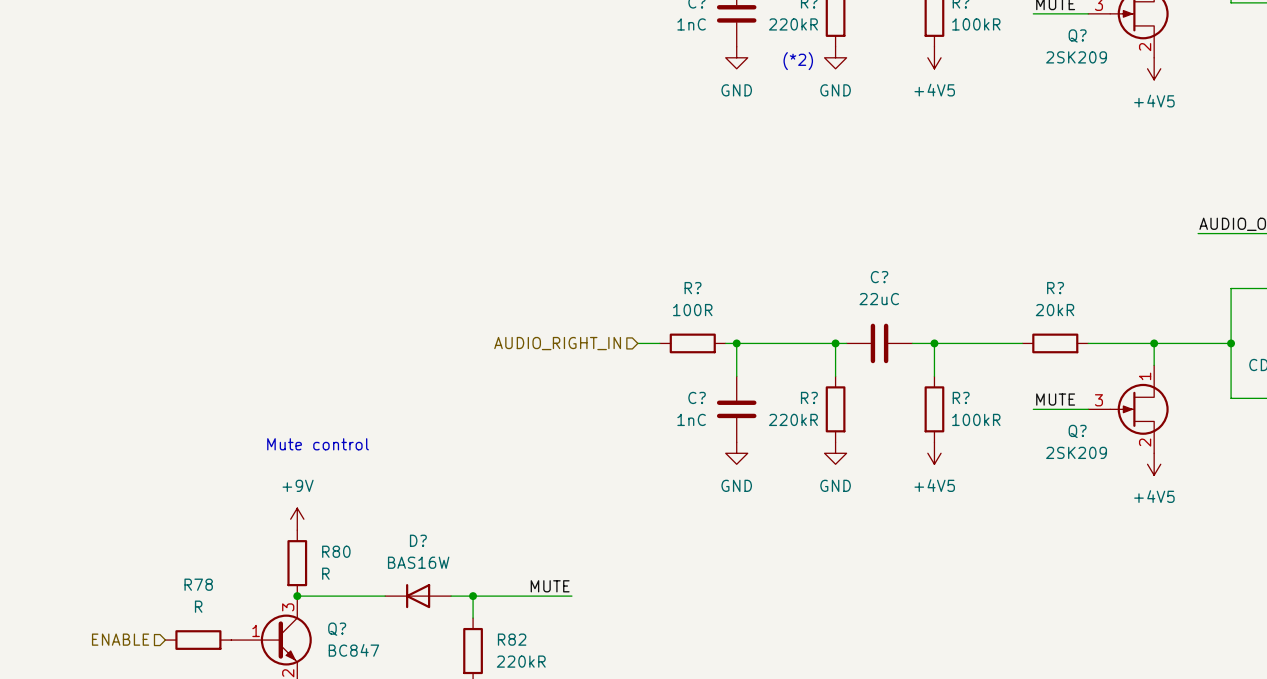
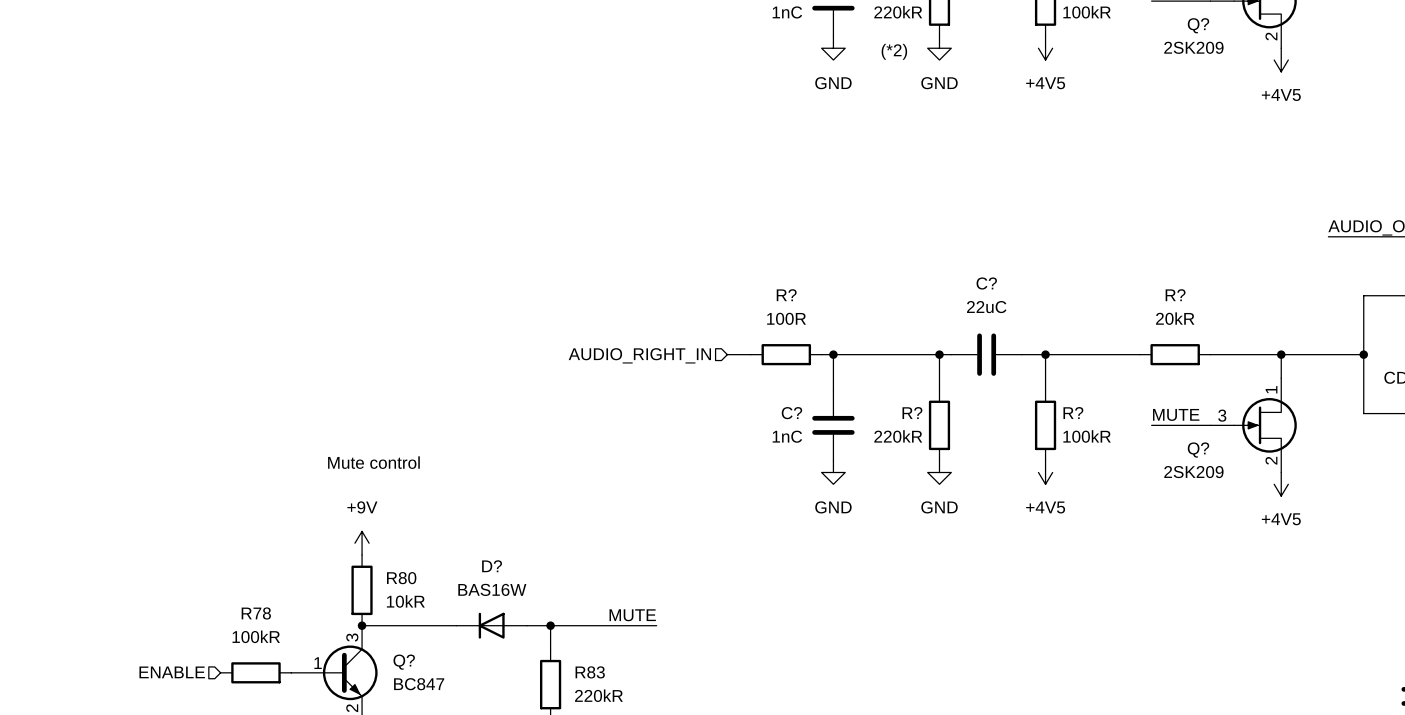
R80 value: R (325, 573) -> 10kR (405, 601)
R78 value: R (198, 606) -> 100kR (256, 636)
R82 name: R82 (512, 639) -> R83 (590, 672)

